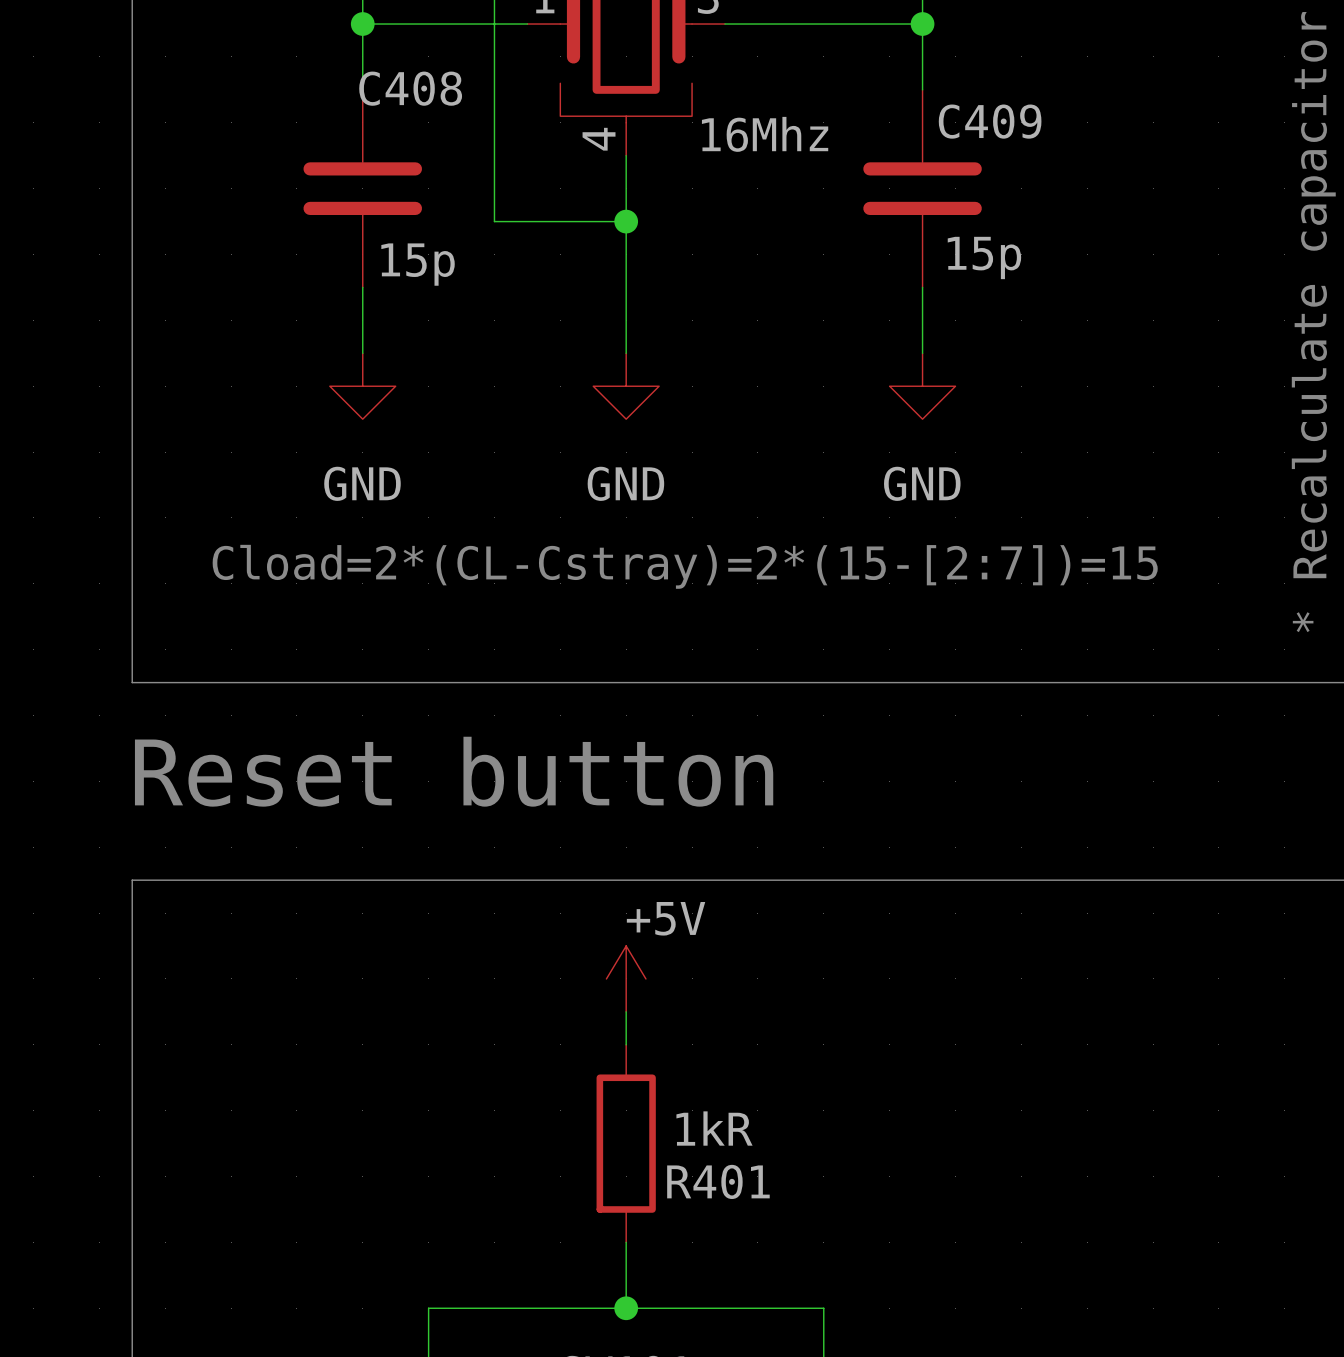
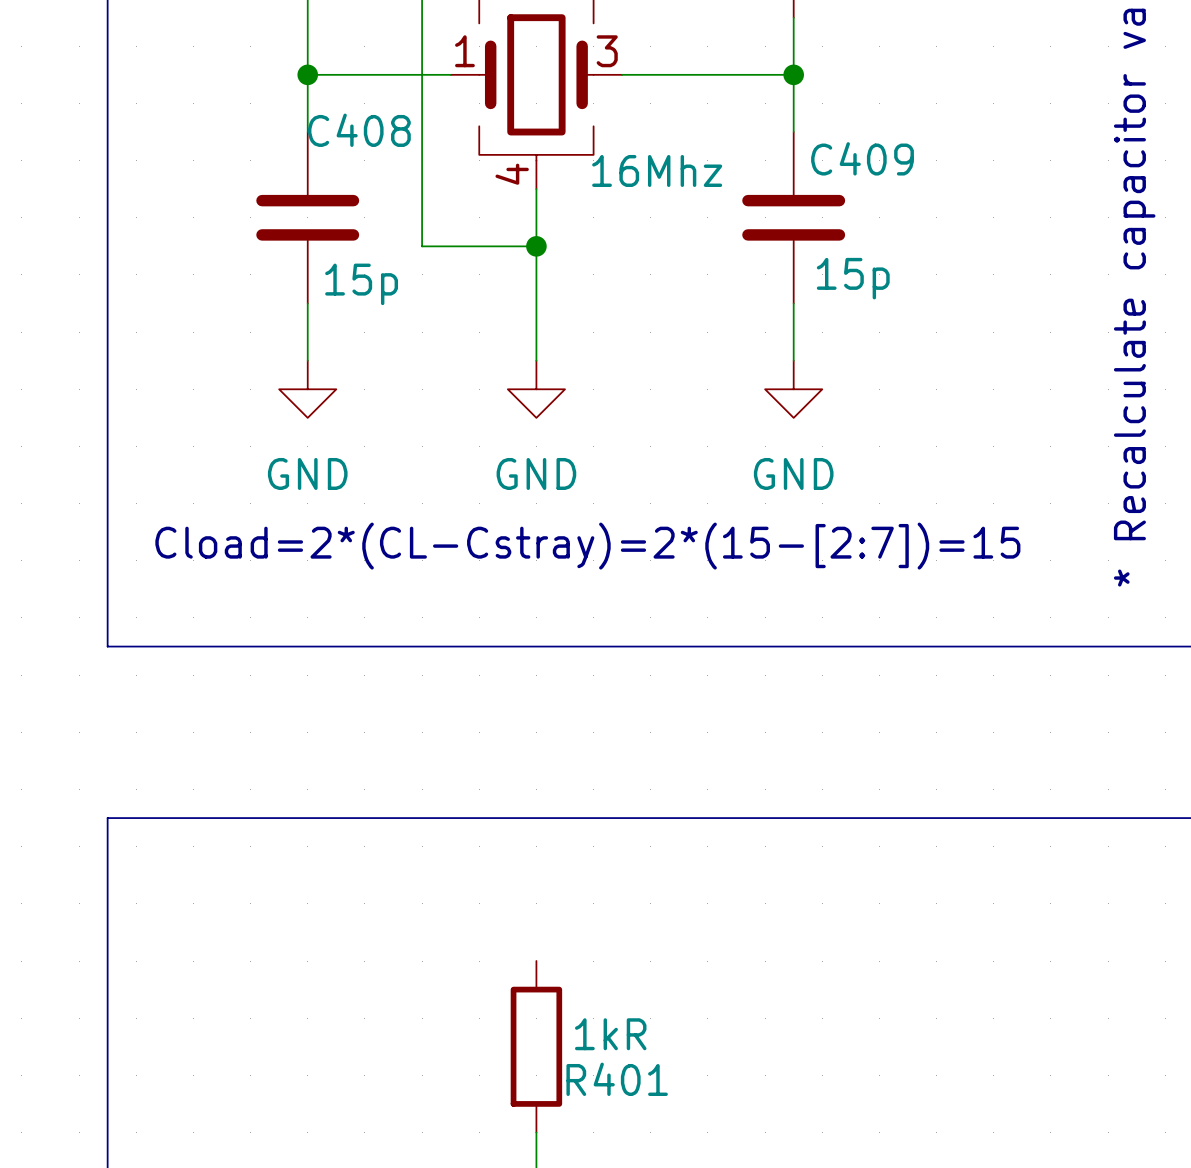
text: Reset button (454, 771) -> none
power symbol: +5V (626, 978) -> none
wire: (626, 1011) (626, 1044) -> none

